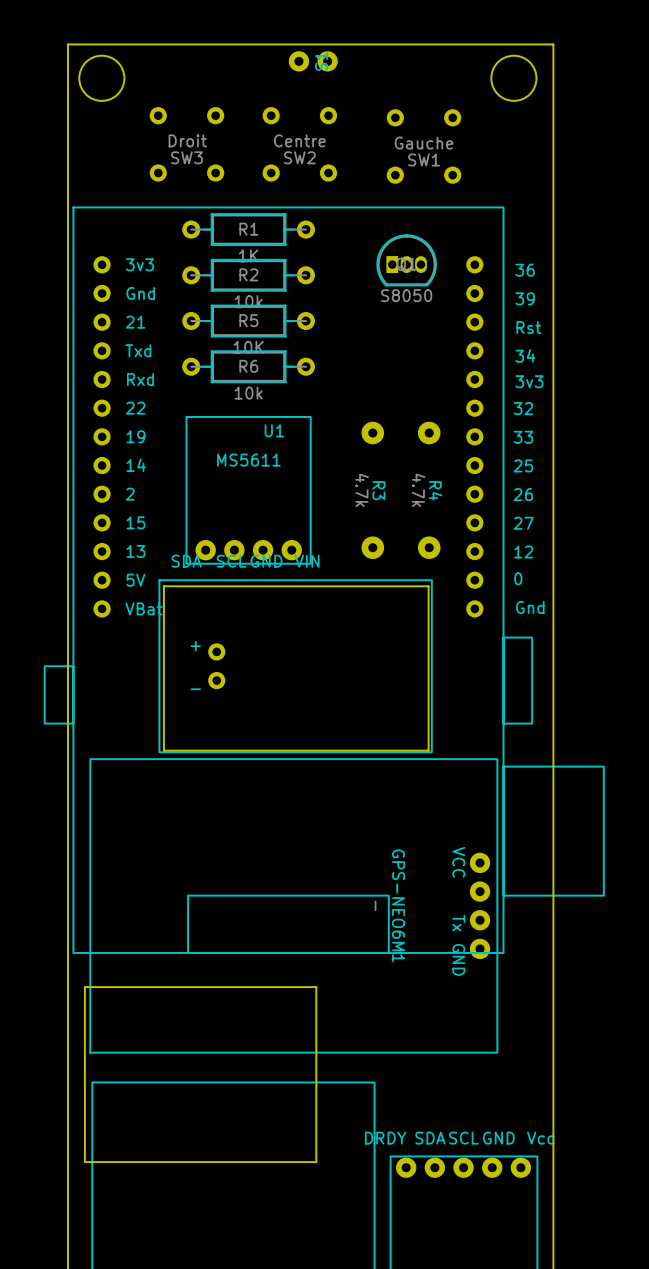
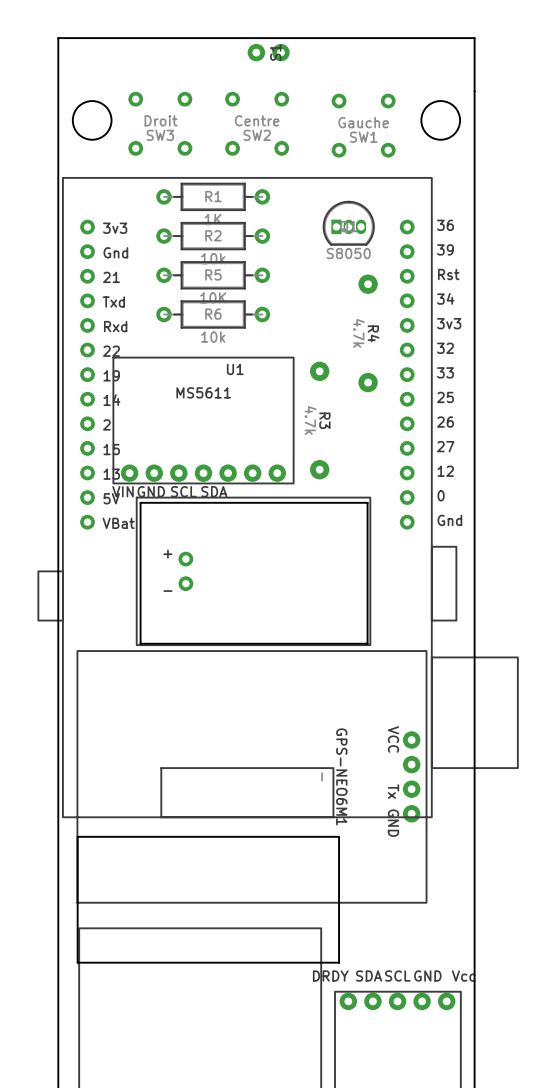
round board edge position: (101, 78) -> (92, 120)
round board edge position: (513, 78) -> (440, 120)
U1 footprint: [44, 206, 605, 954] -> [37, 177, 519, 818]
MS5611 footprint: [185, 416, 312, 565] -> [112, 357, 295, 484]
R4 position: (429, 490) -> (368, 333)
board edge: (84, 987) (316, 987) (316, 1162) (84, 1162) (84, 987) -> (77, 836) (77, 962) (339, 962) (339, 836) (77, 836)

